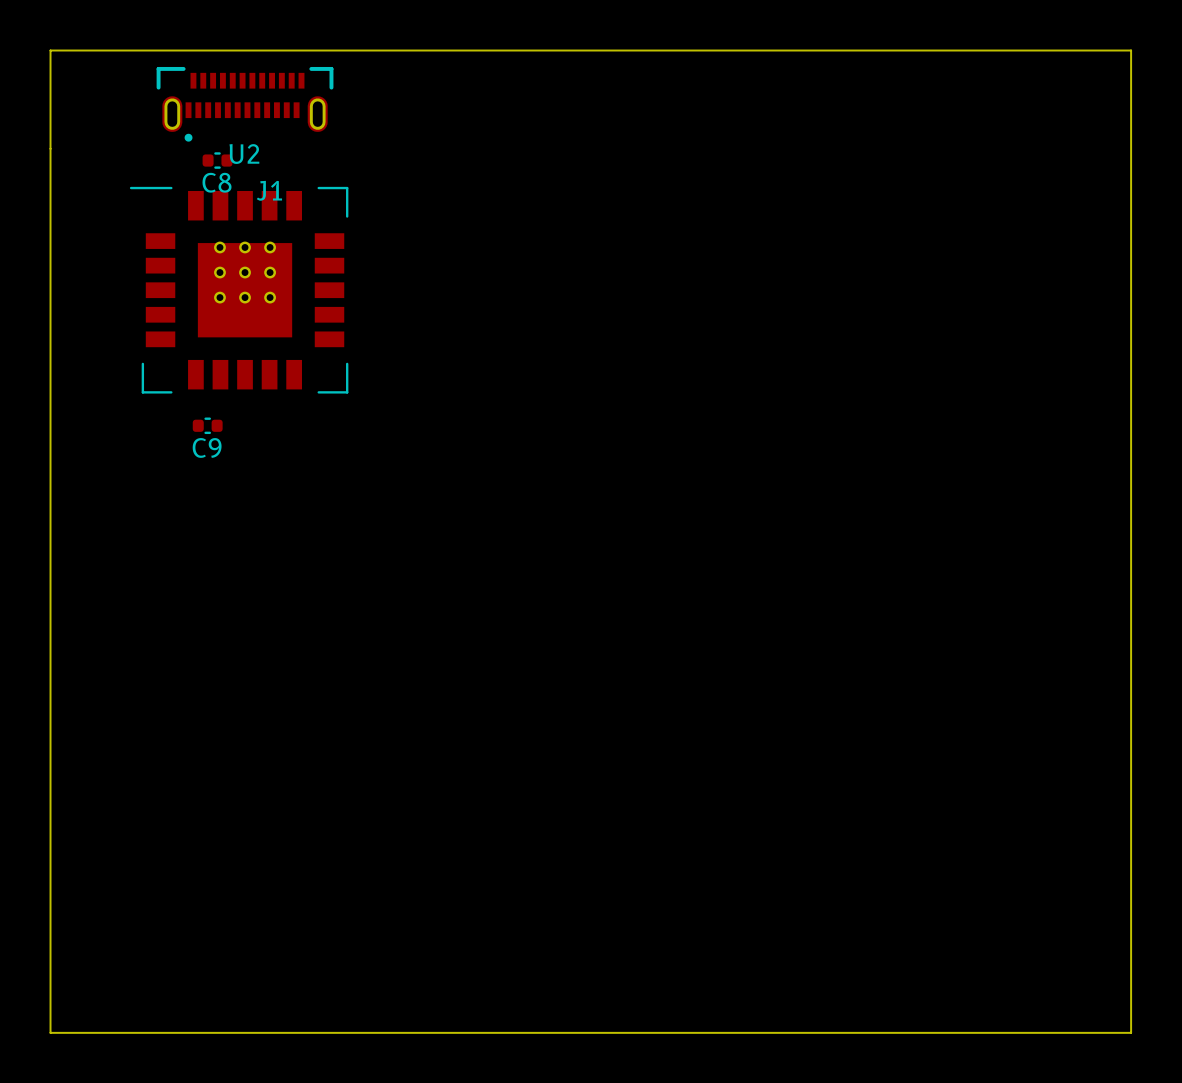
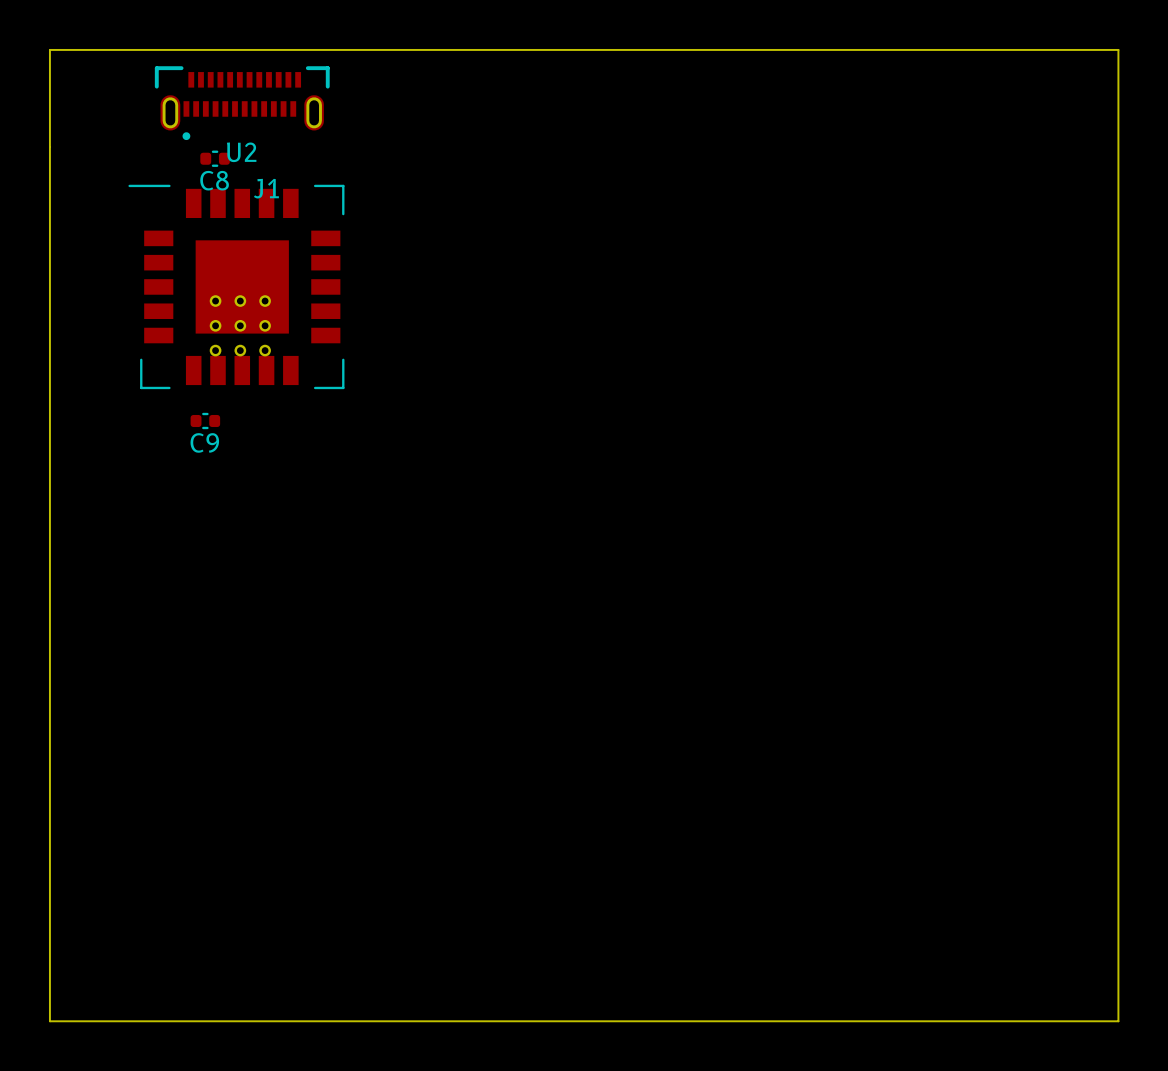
part position: (245, 272) -> (240, 325)

